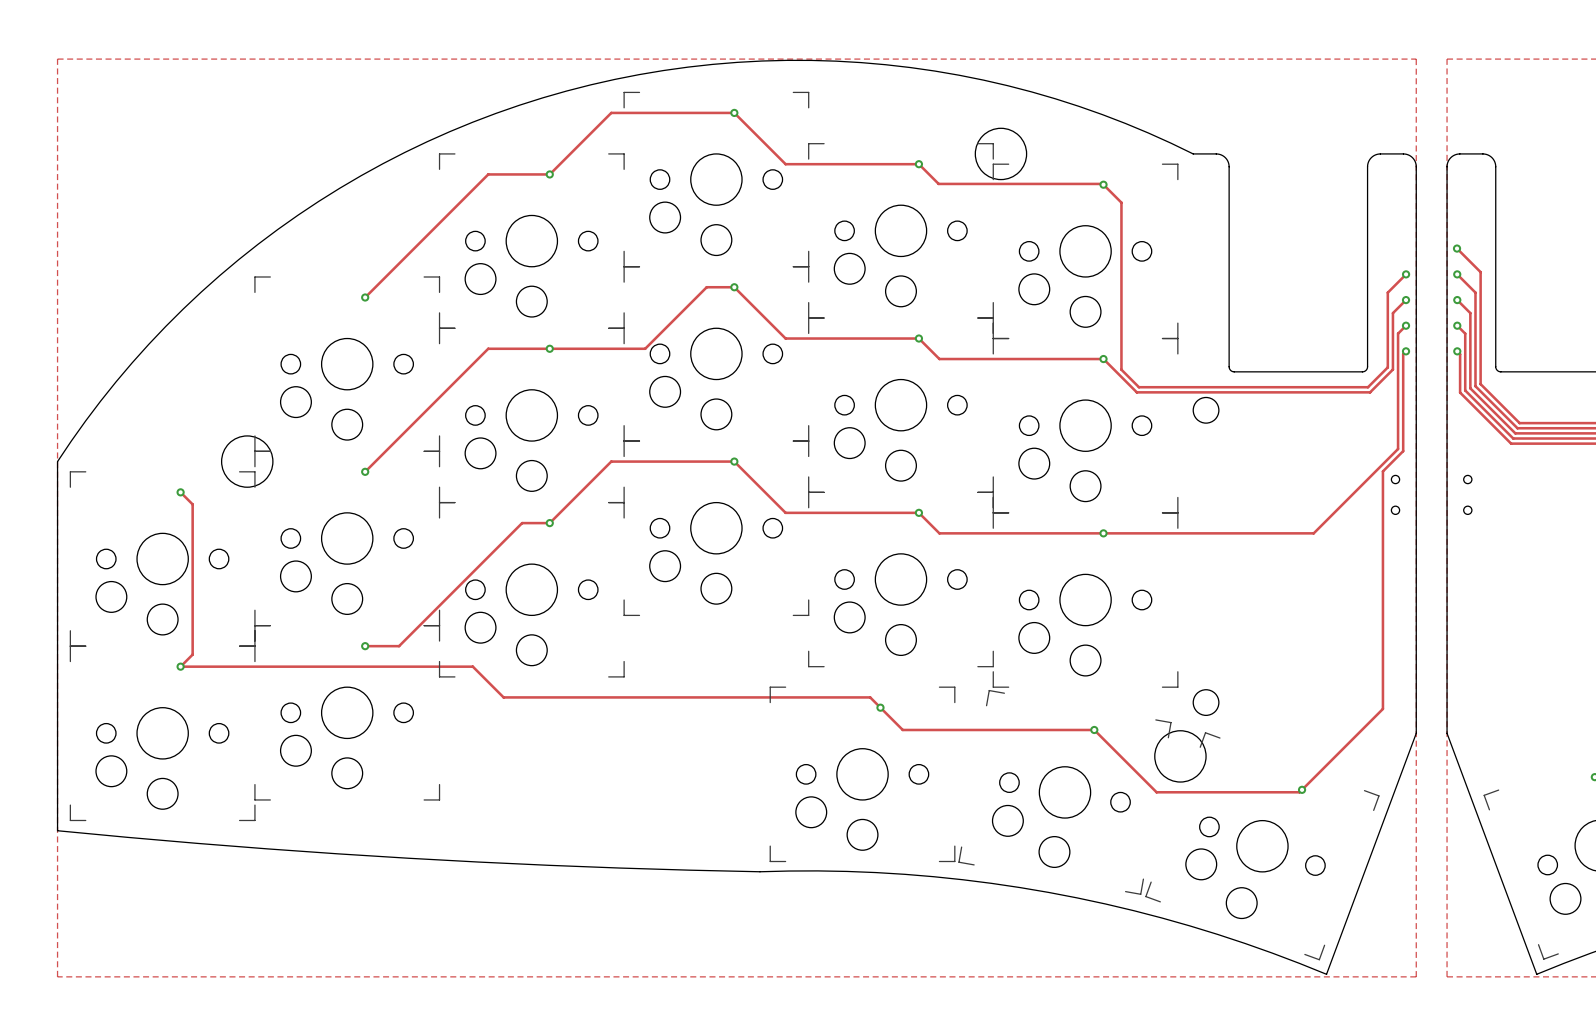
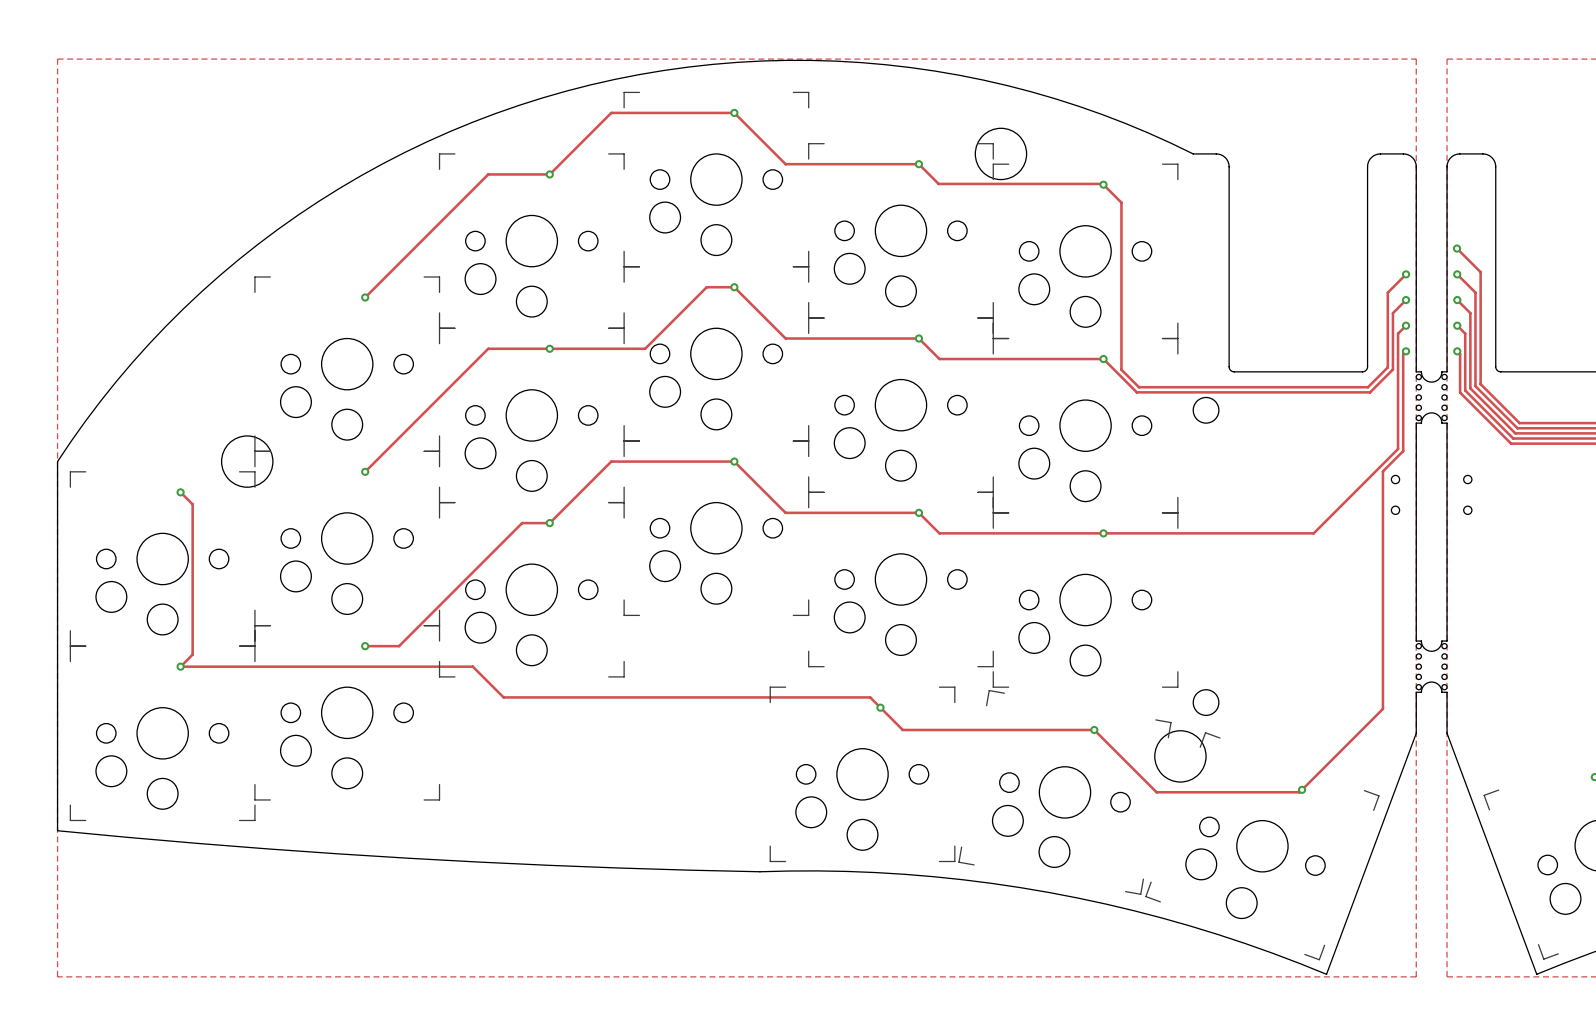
board edge: (1416, 371) (1416, 423) -> none
board edge: (1447, 371) (1447, 423) -> none
part: none -> (1431, 397)
board edge: (1416, 641) (1416, 692) -> none
board edge: (1447, 641) (1447, 692) -> none
part: none -> (1431, 666)

